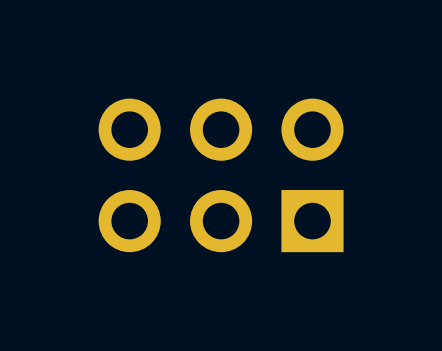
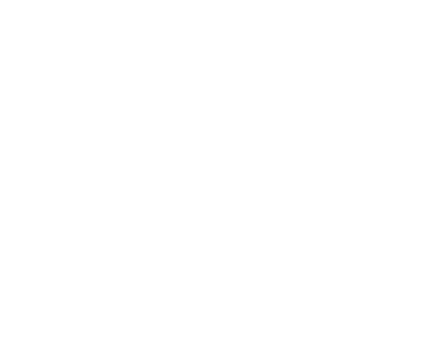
part: (221, 175) -> none

